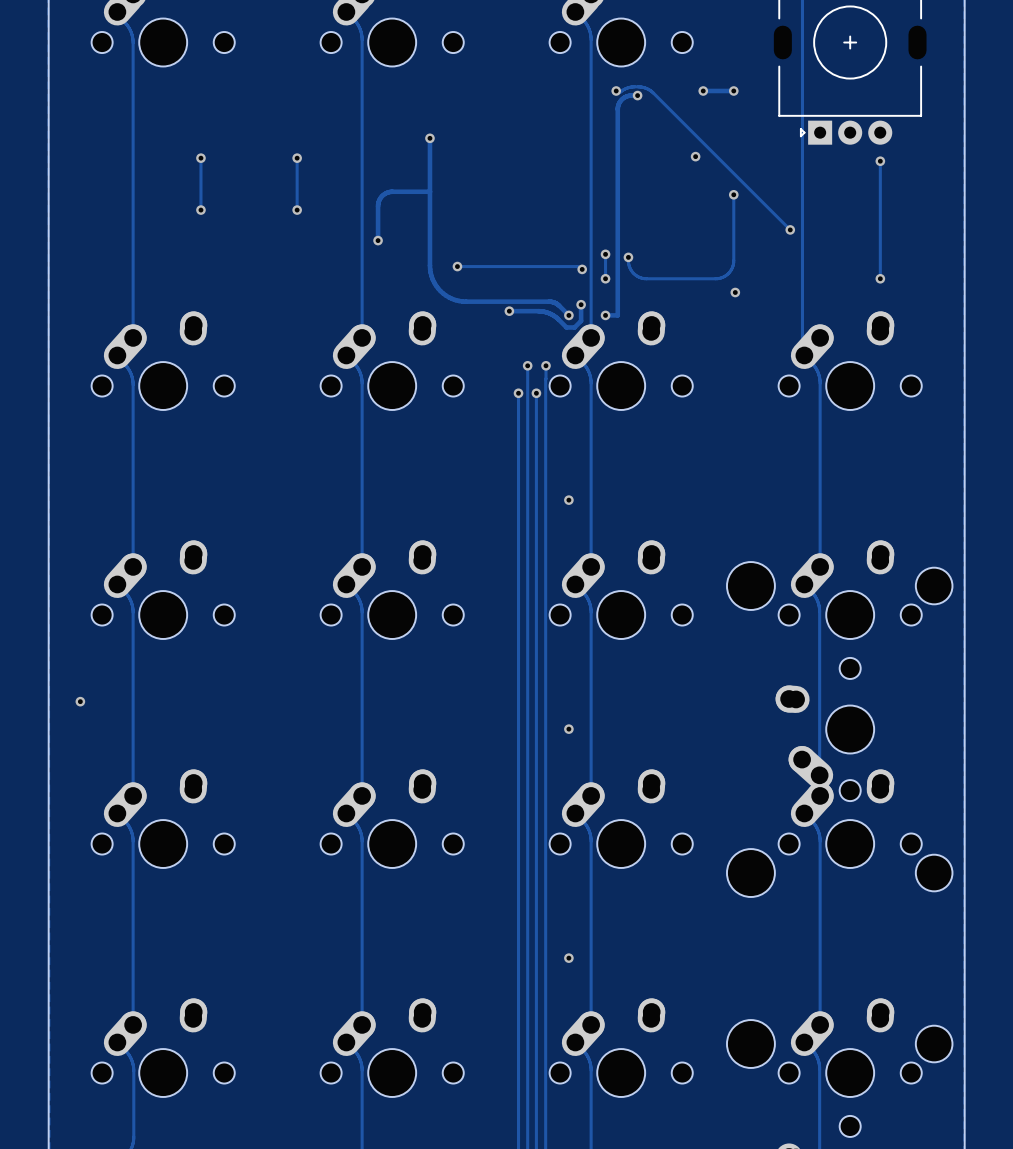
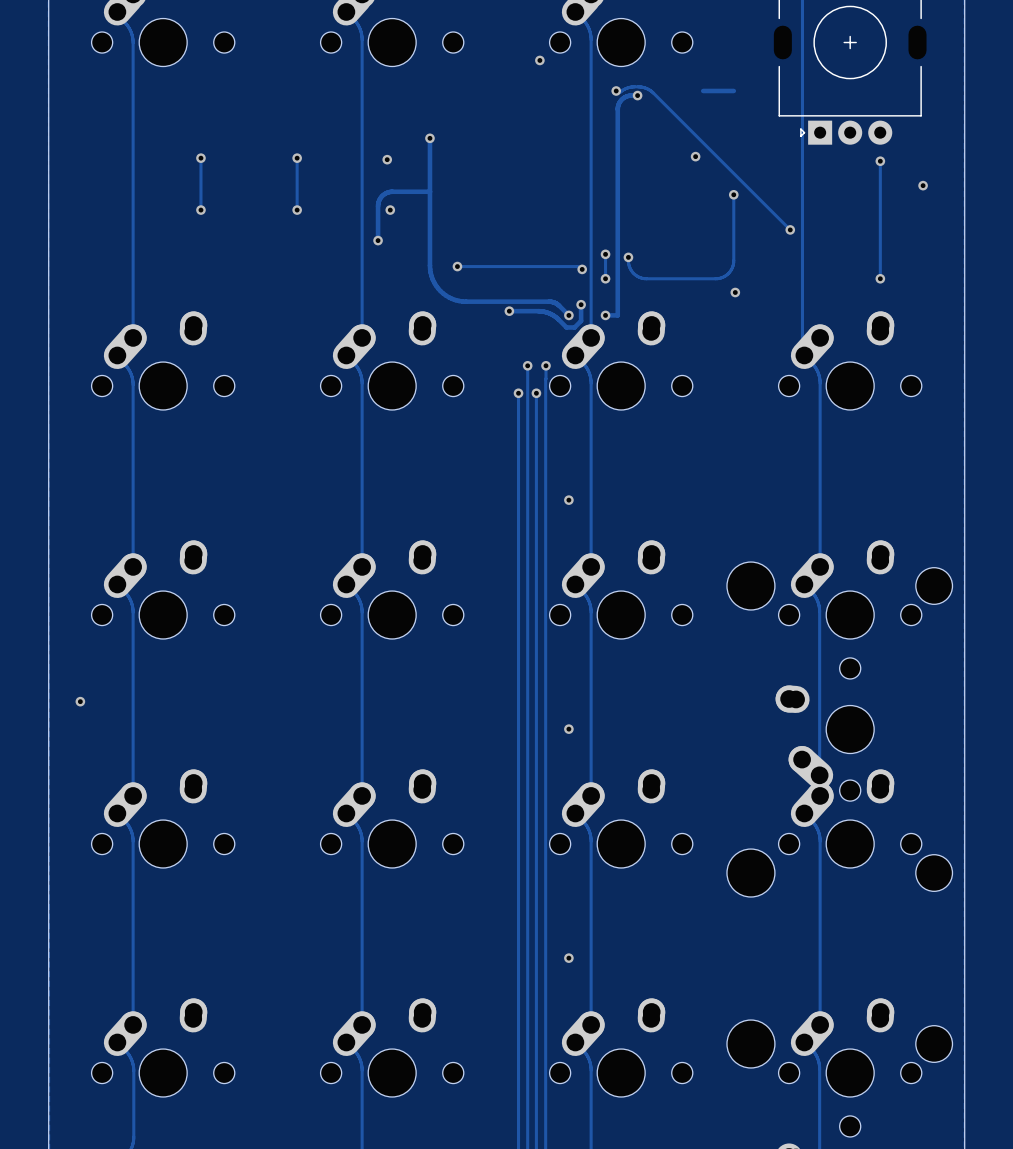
via: none -> (539, 60)
via: (703, 90) -> none
via: (733, 90) -> none
via: none -> (387, 159)
via: none -> (923, 185)
via: none -> (390, 210)

